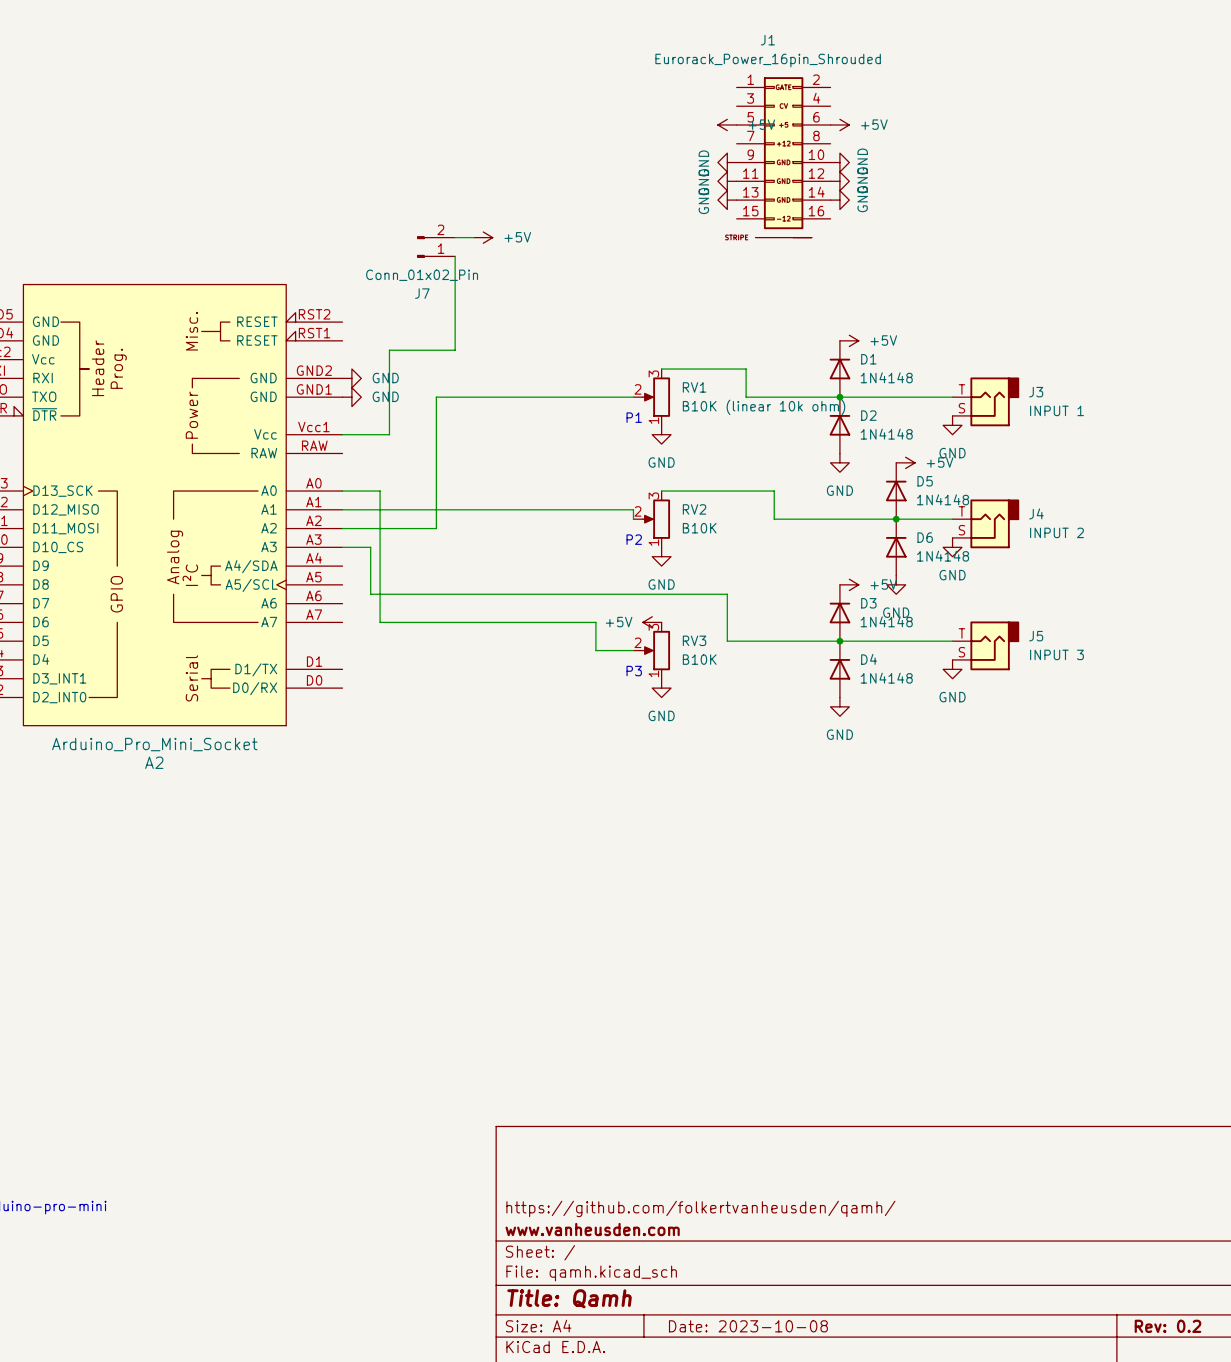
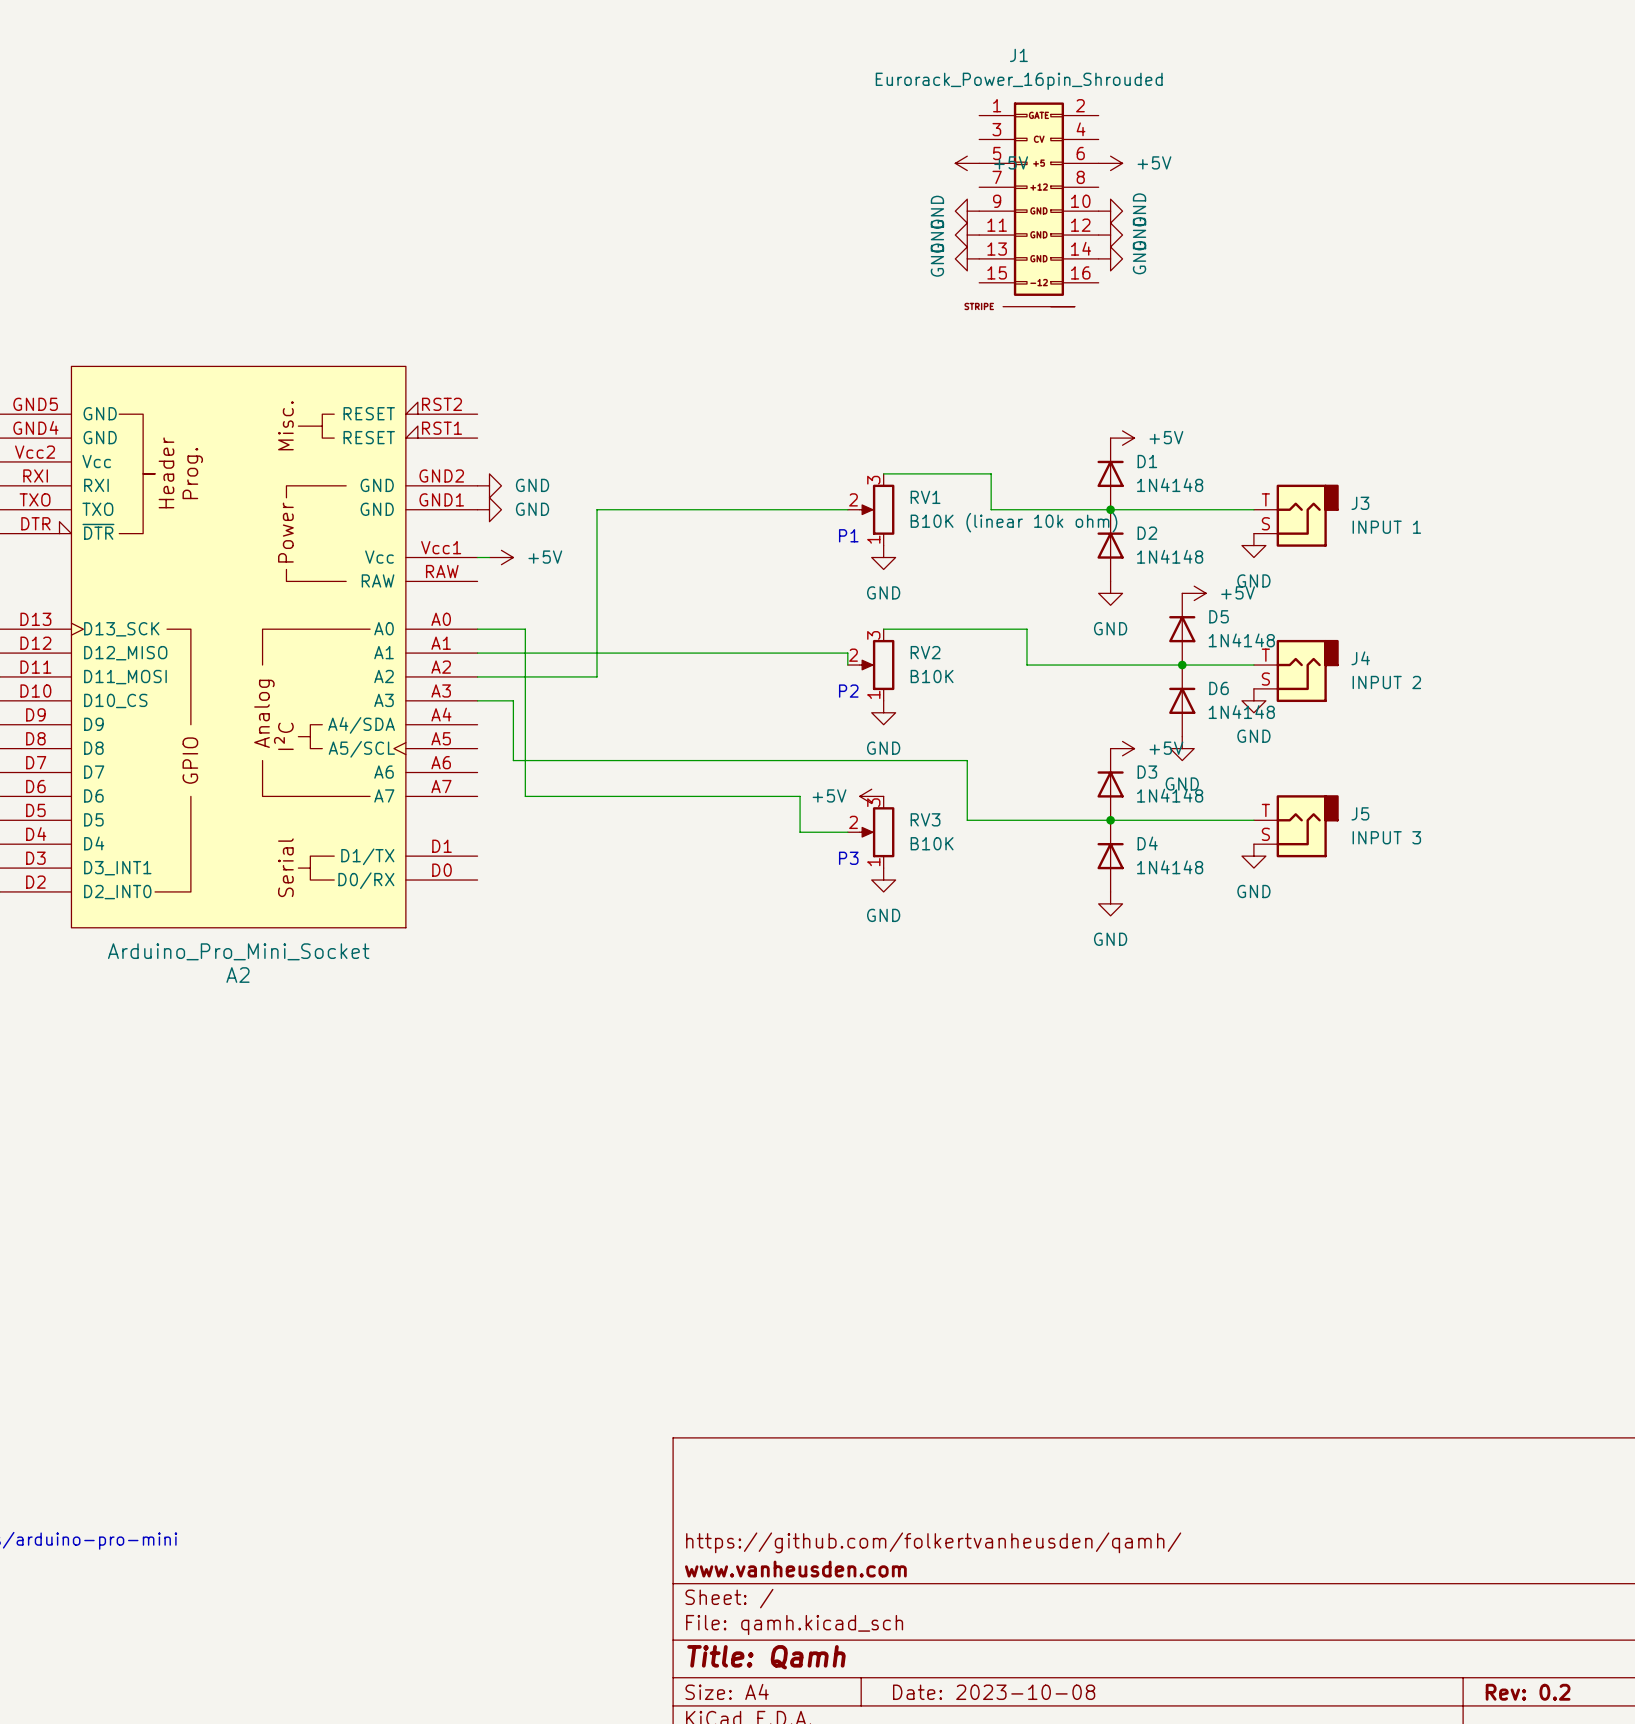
wire: (455, 237) (473, 237) -> none
power symbol: +5V (483, 237) -> none
J7: Conn_01x02_Pin (436, 247) -> none
wire: (455, 256) (455, 350) (389, 350) (389, 434) (351, 434) -> none
power symbol: none -> +5V (501, 557)

